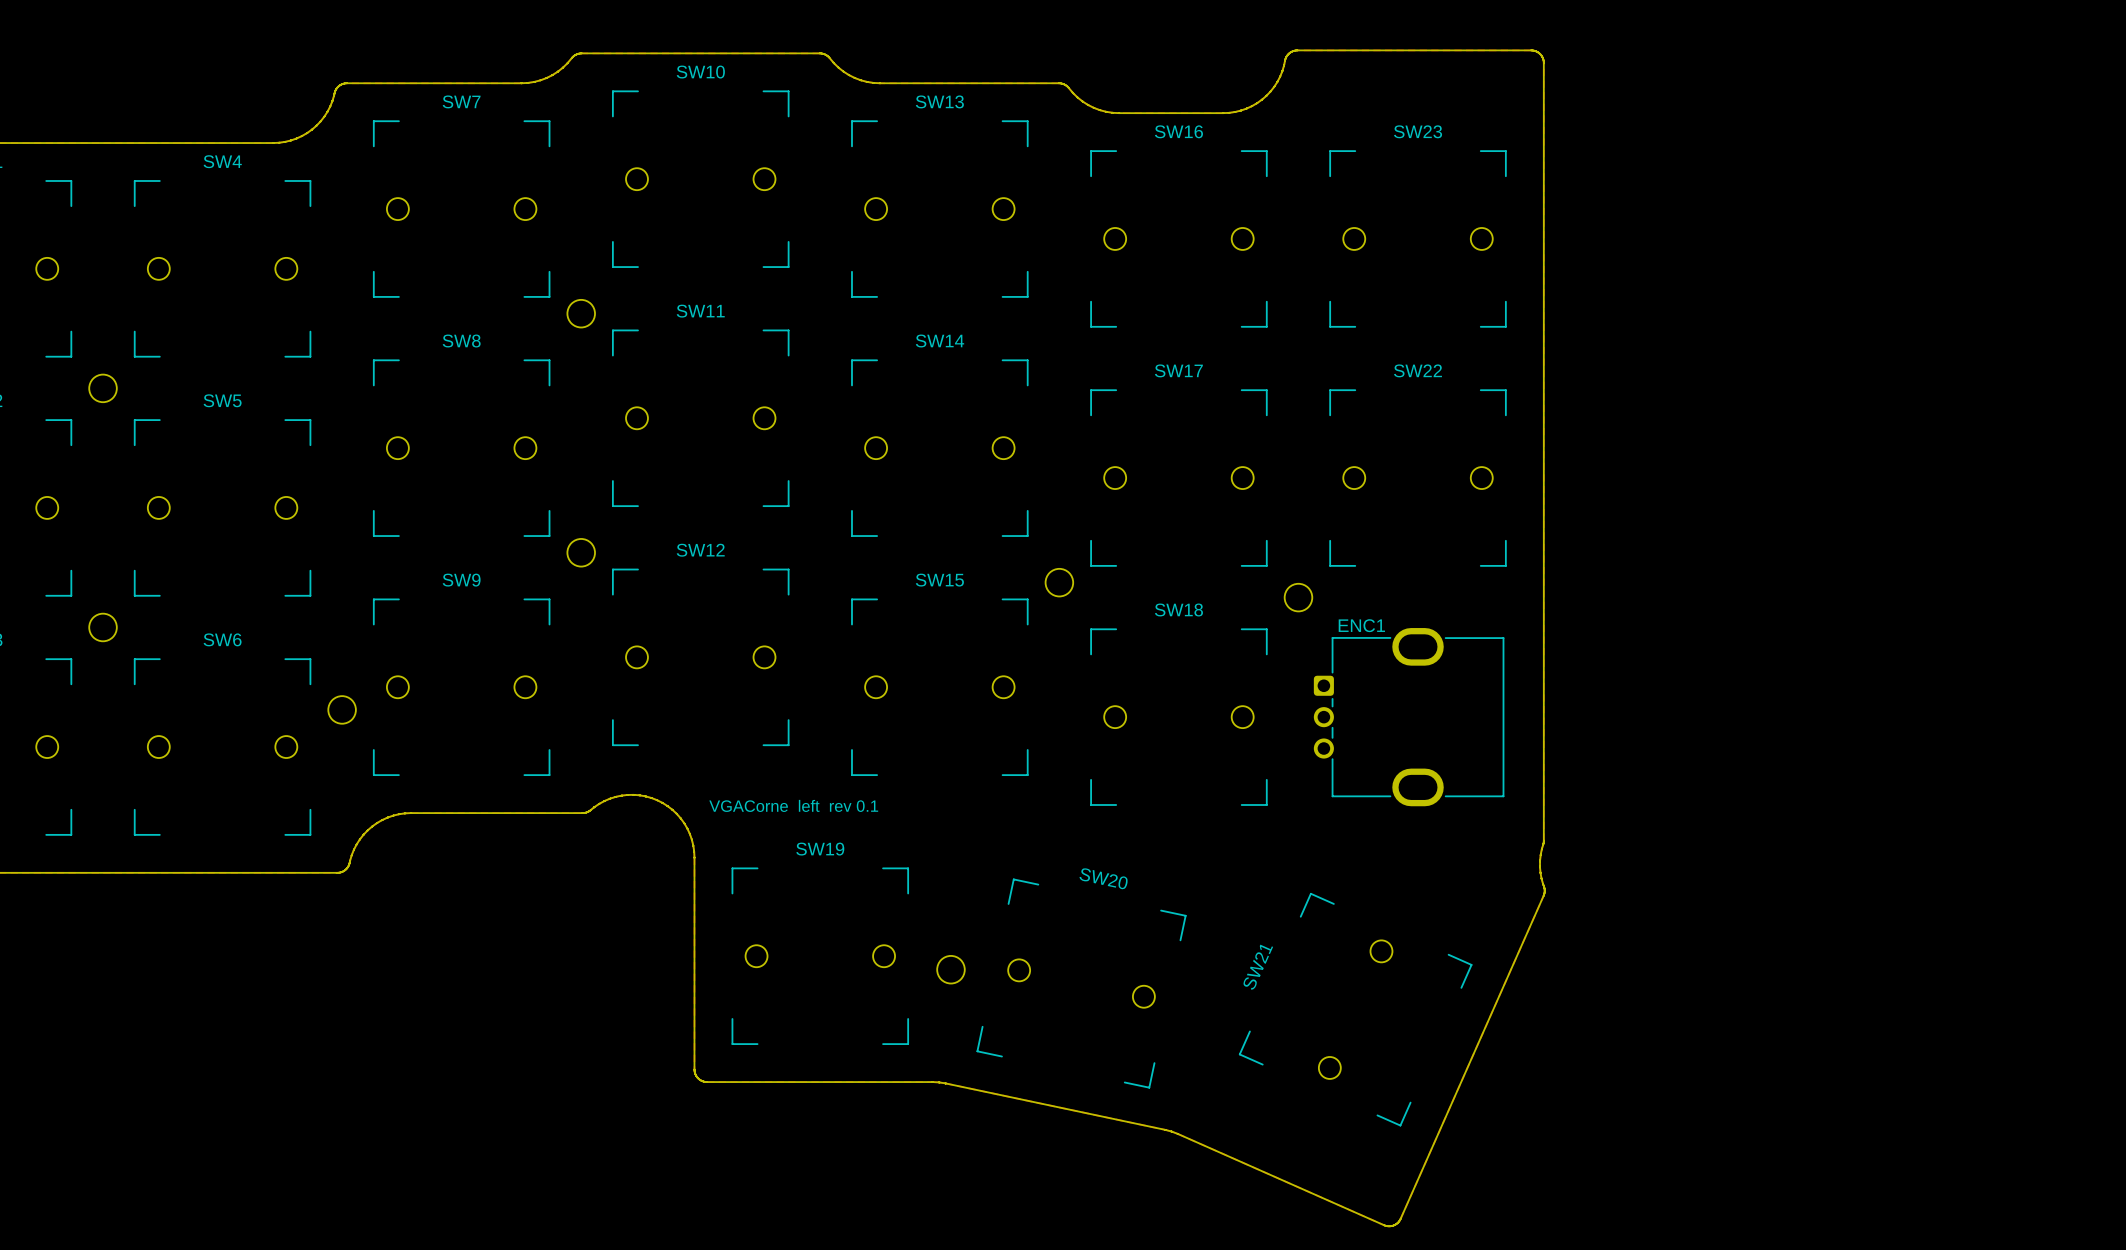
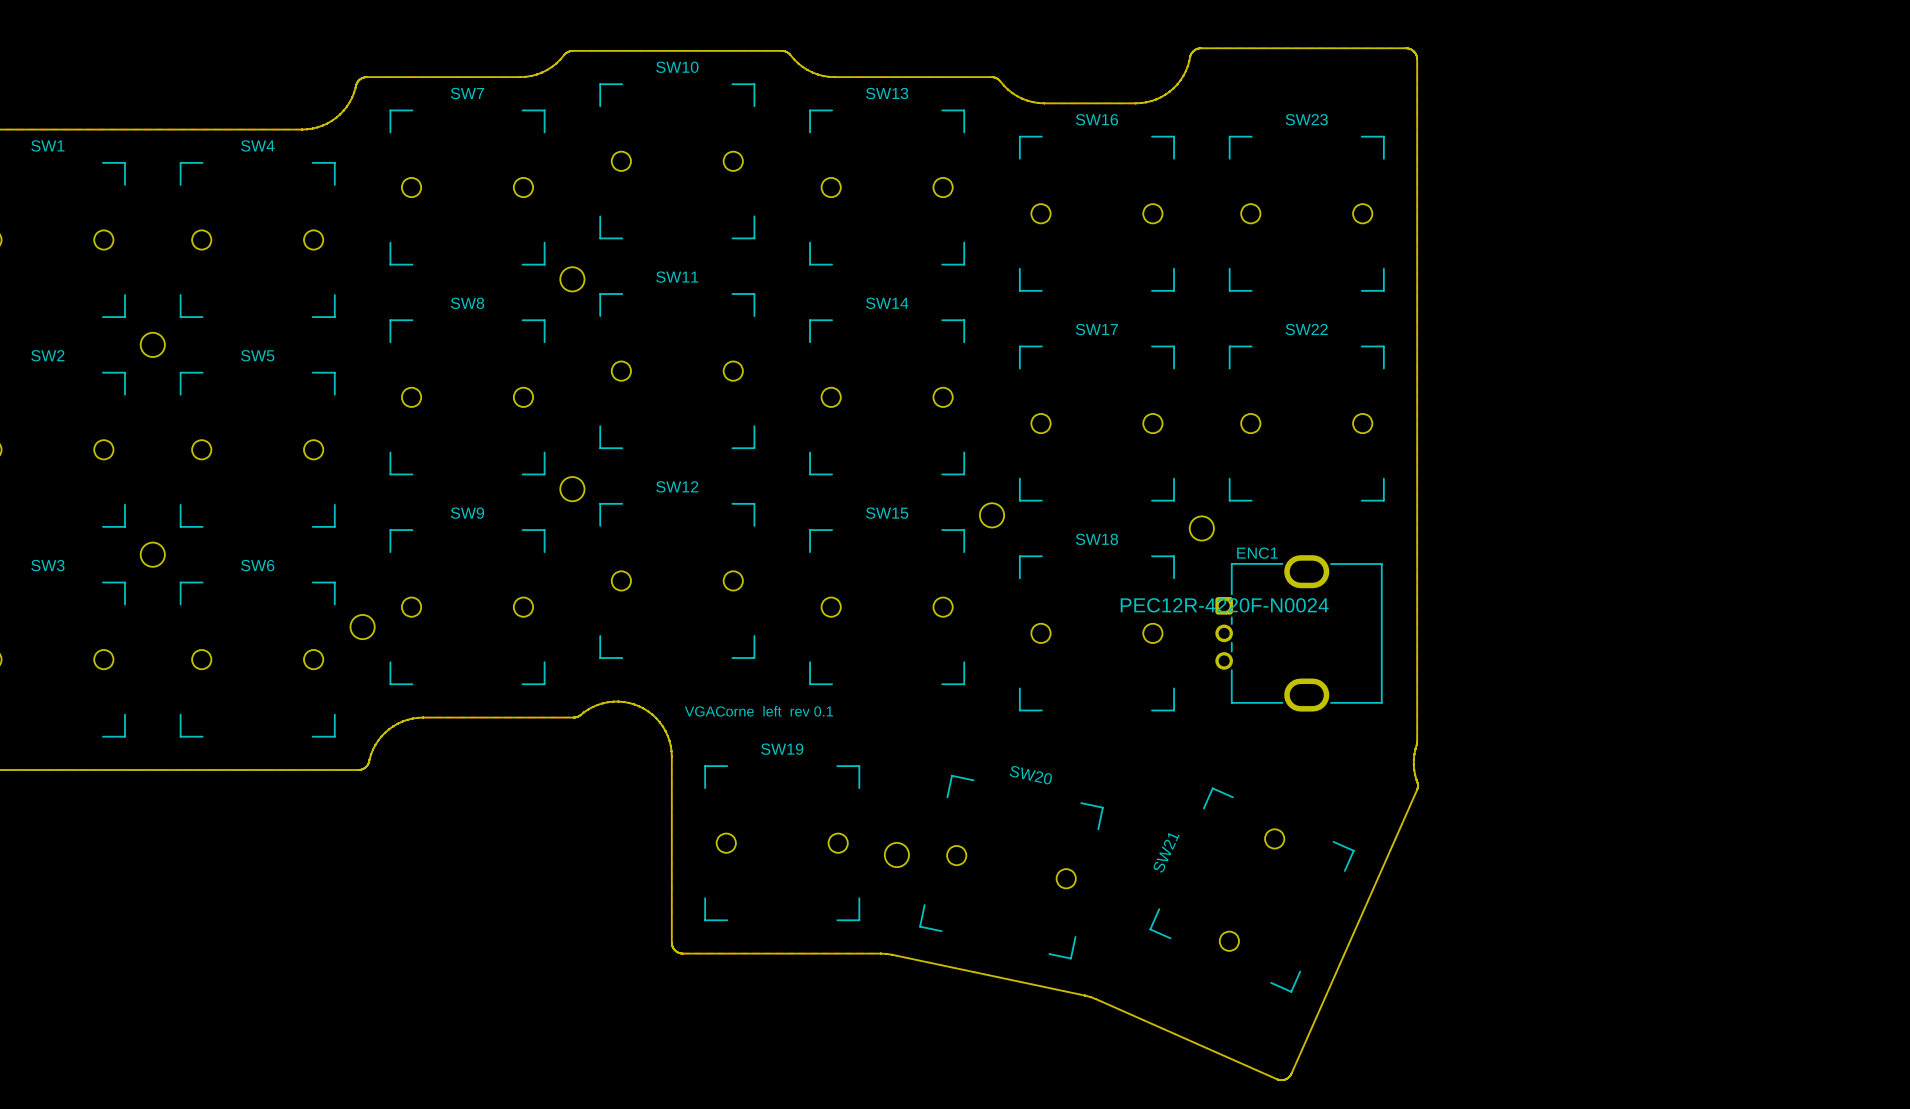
ENC1 text: none -> PEC12R-4220F-N0024 (1224, 605)

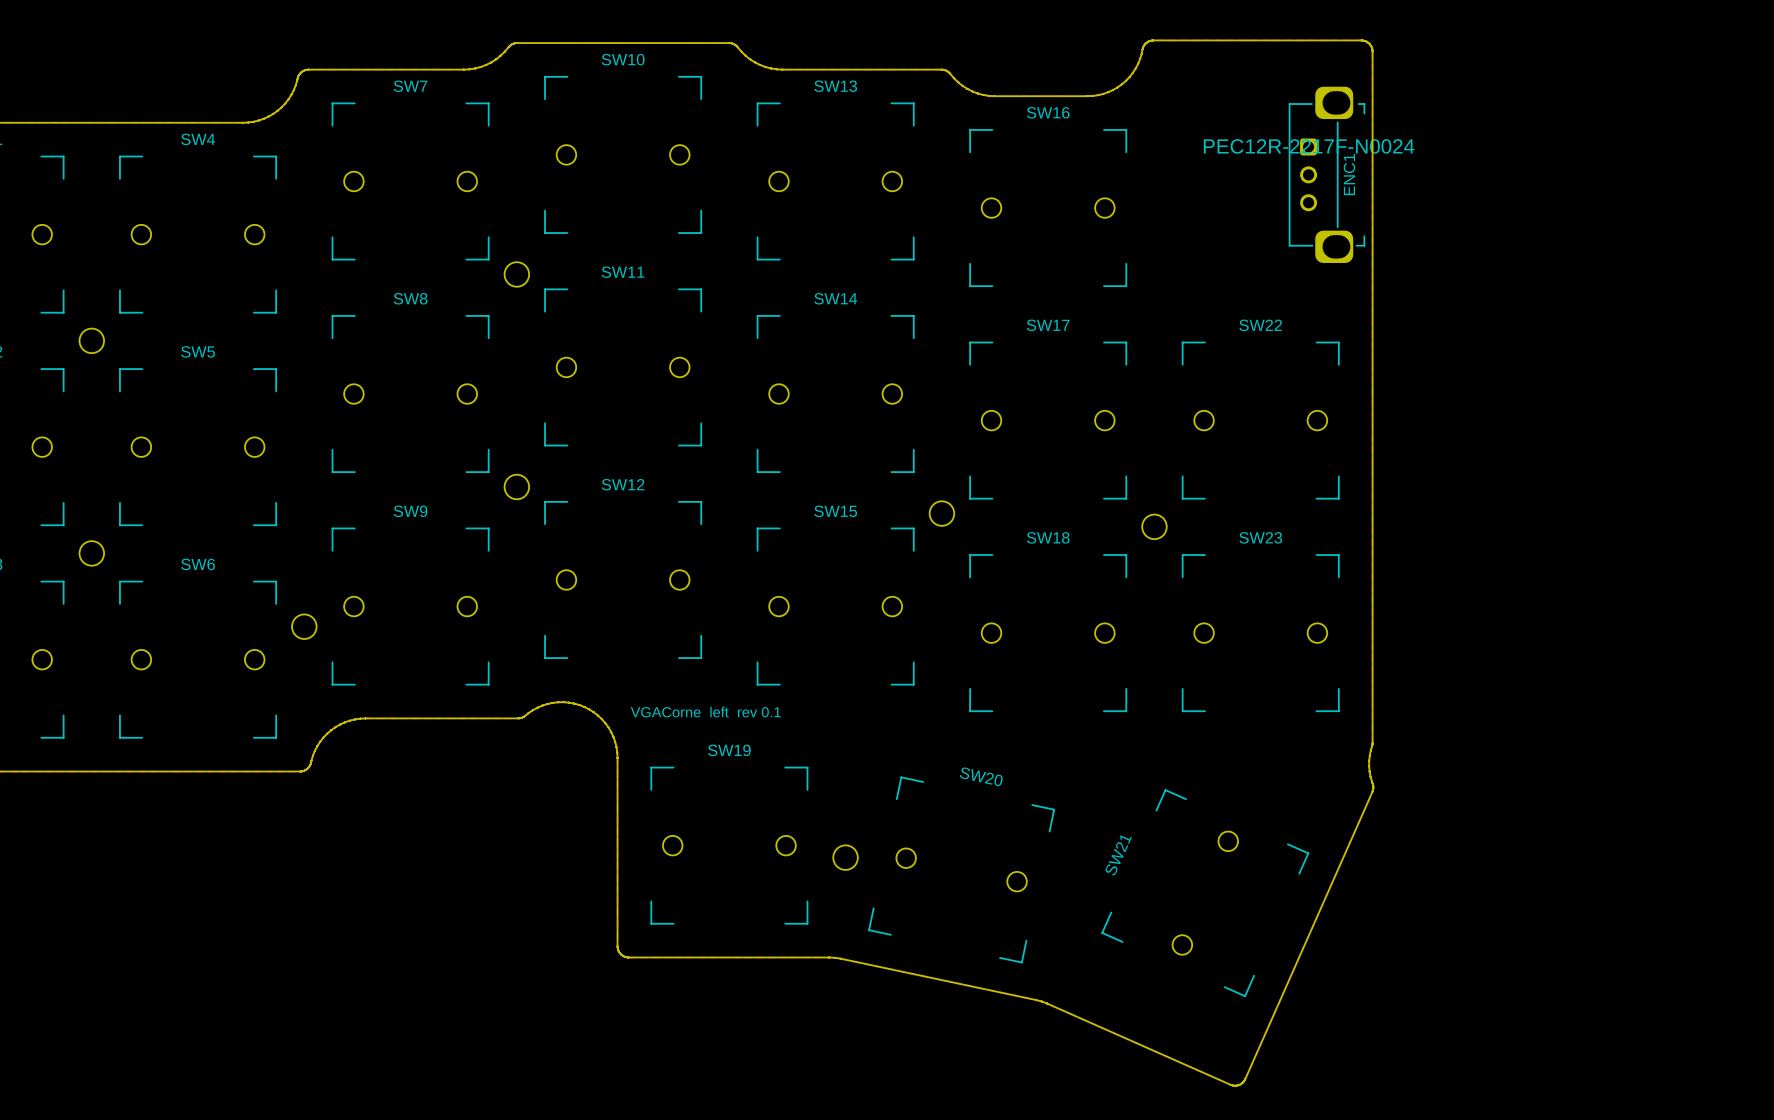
SW23 position: (1306, 213) -> (1260, 633)
ENC1 name position: ENC1 (1257, 553) -> ENC1 (1349, 174)
ENC1 footprint: [1215, 555, 1383, 712] -> [1288, 86, 1366, 263]
ENC1 text: PEC12R-4220F-N0024 (1224, 605) -> PEC12R-2217F-N0024 (1309, 146)

